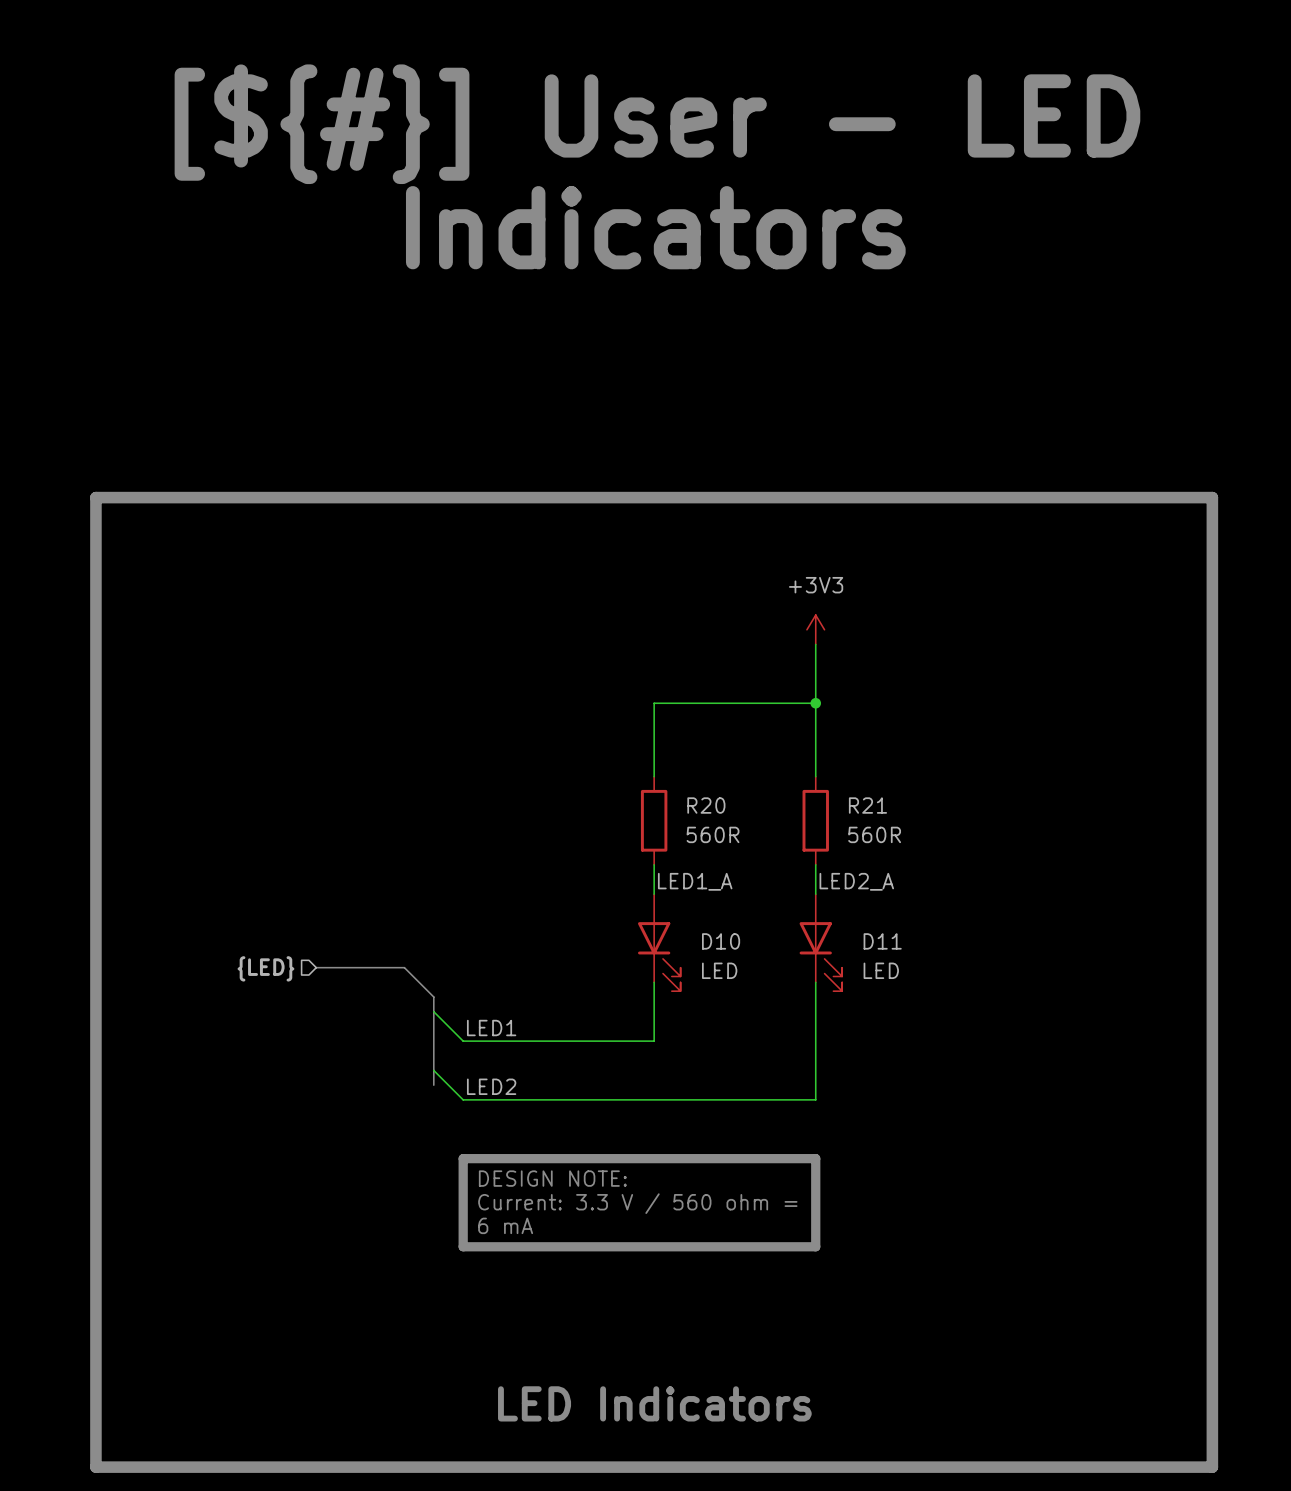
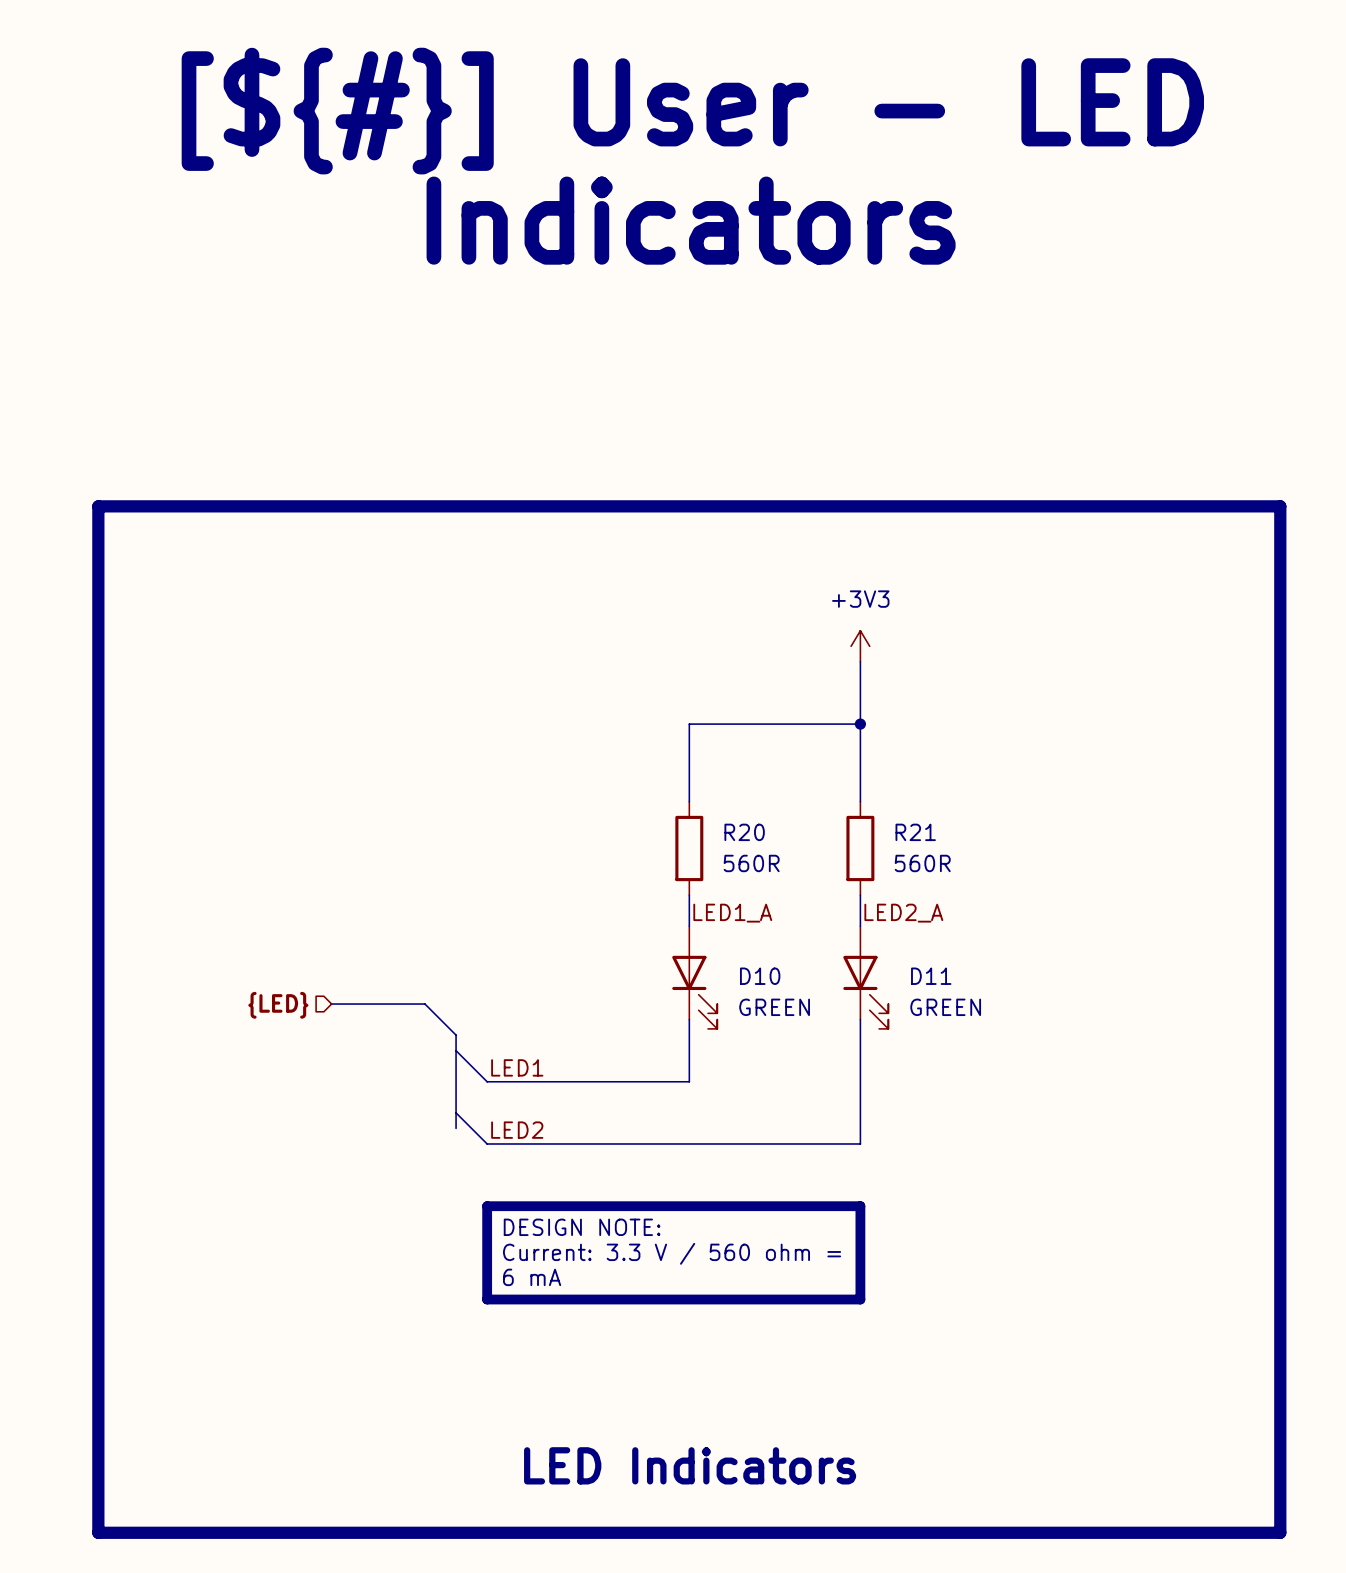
D10 value: LED (719, 970) -> GREEN (774, 1007)
D11 value: LED (881, 970) -> GREEN (945, 1007)

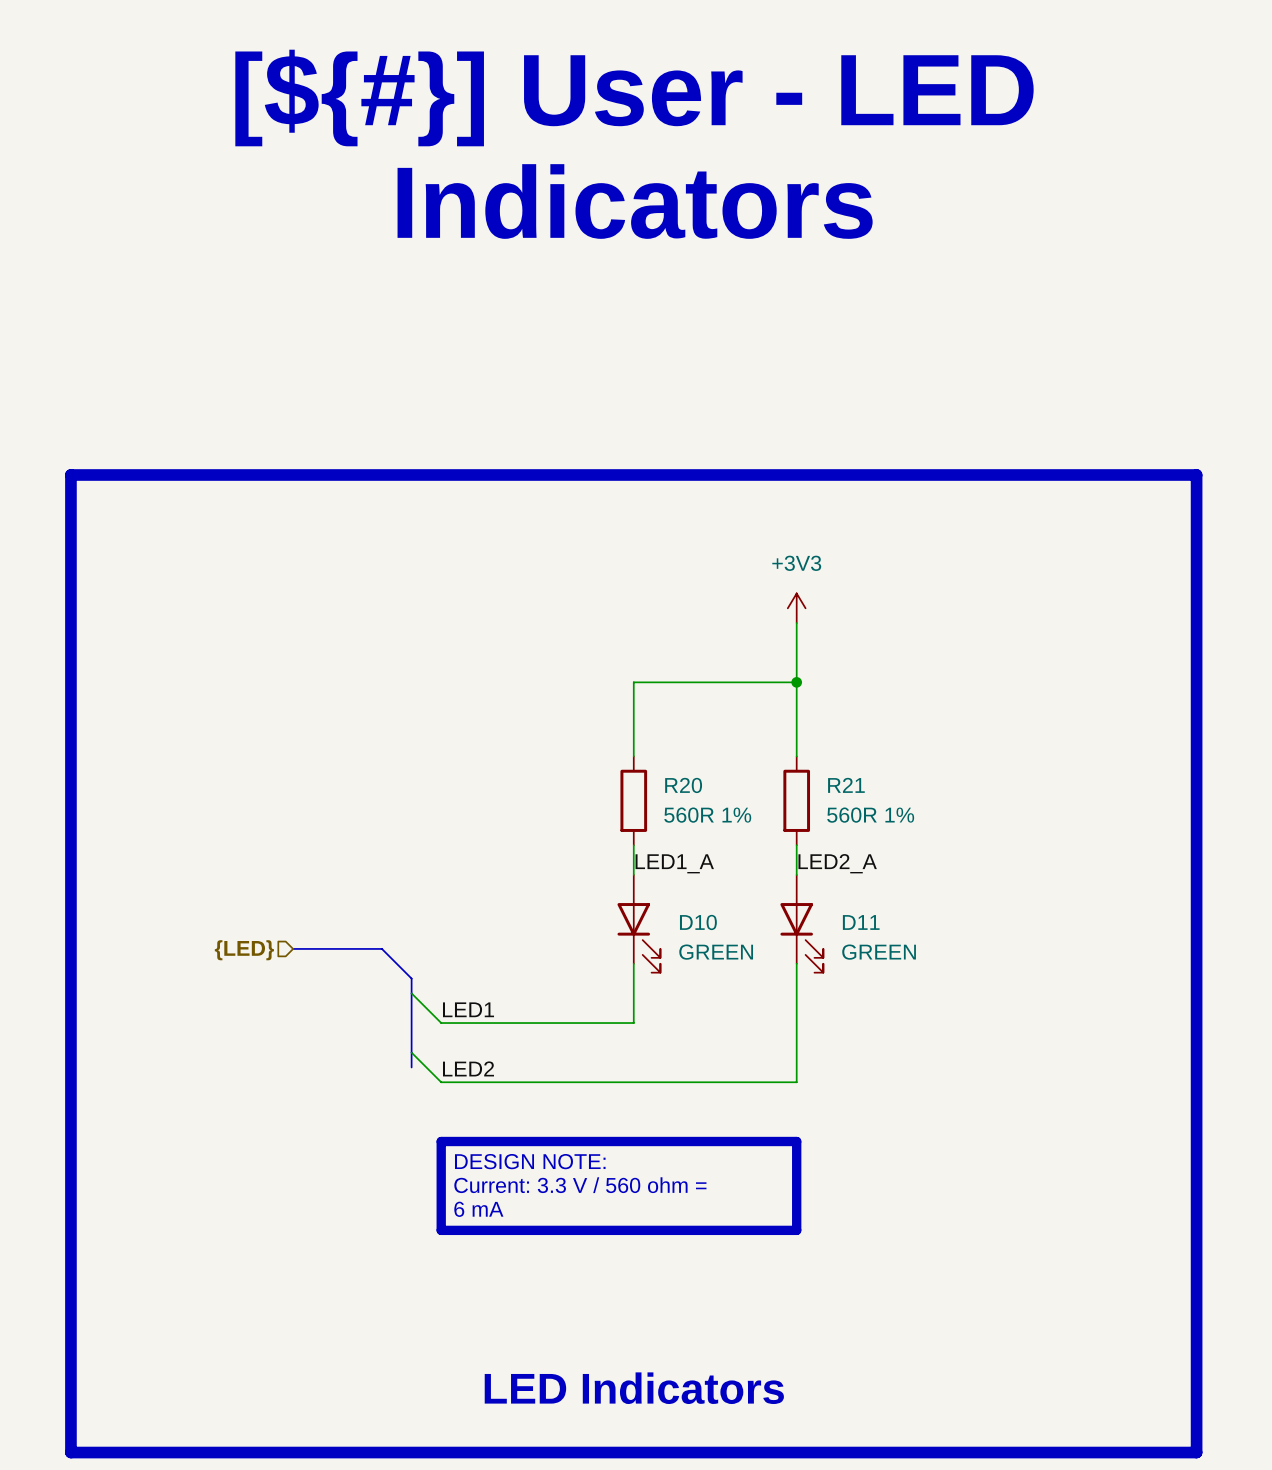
R20 value: 560R (751, 863) -> 560R 1% (707, 815)
R21 value: 560R (922, 863) -> 560R 1% (870, 815)

